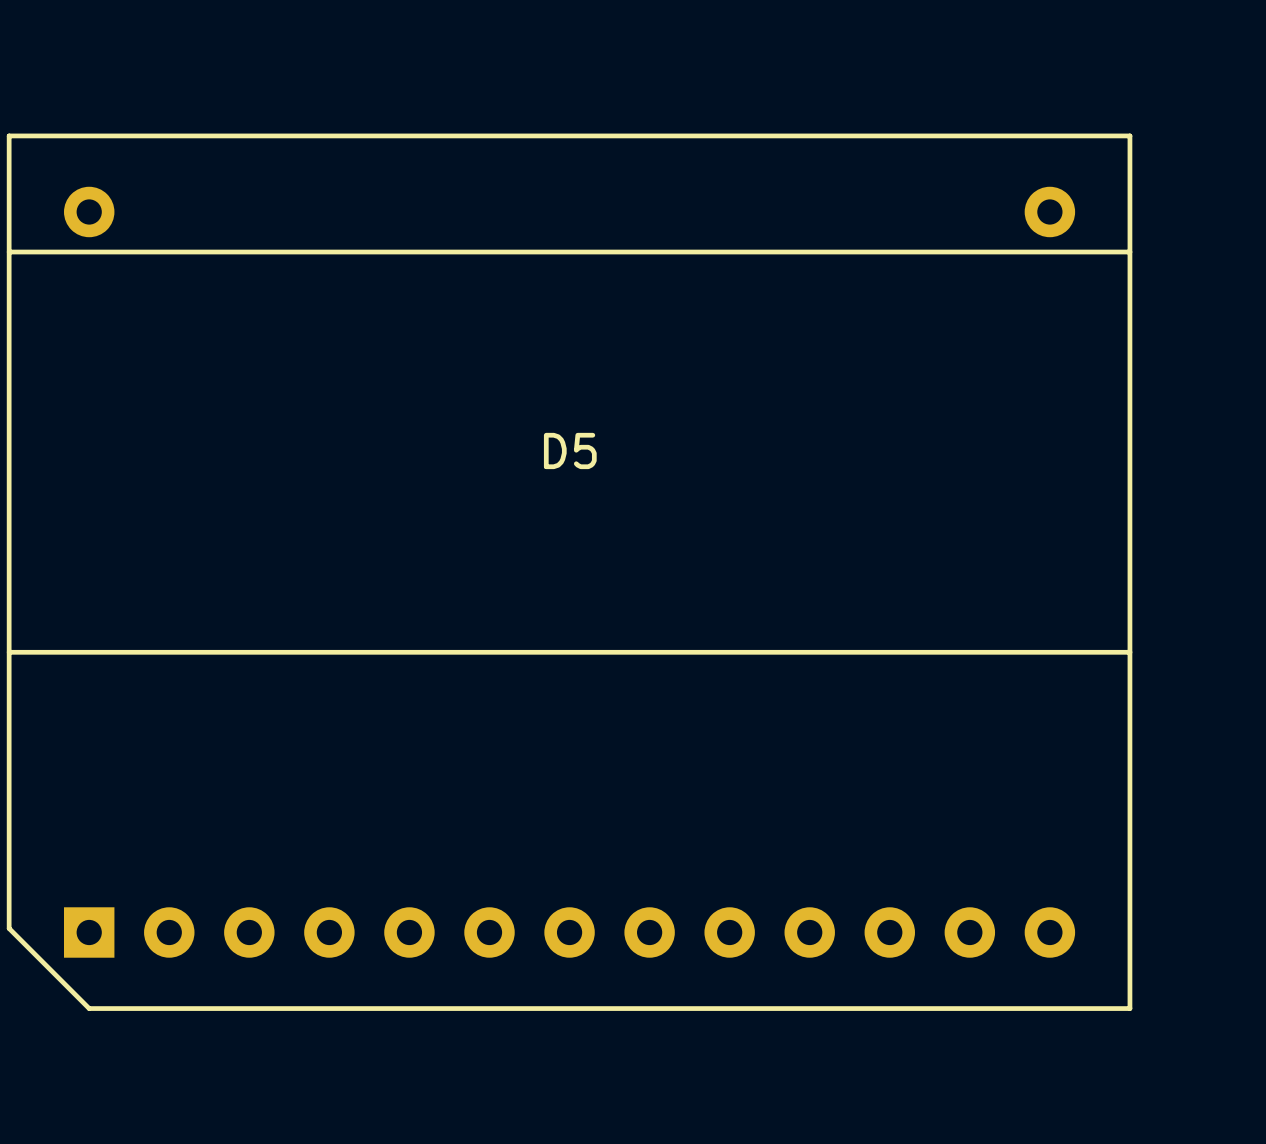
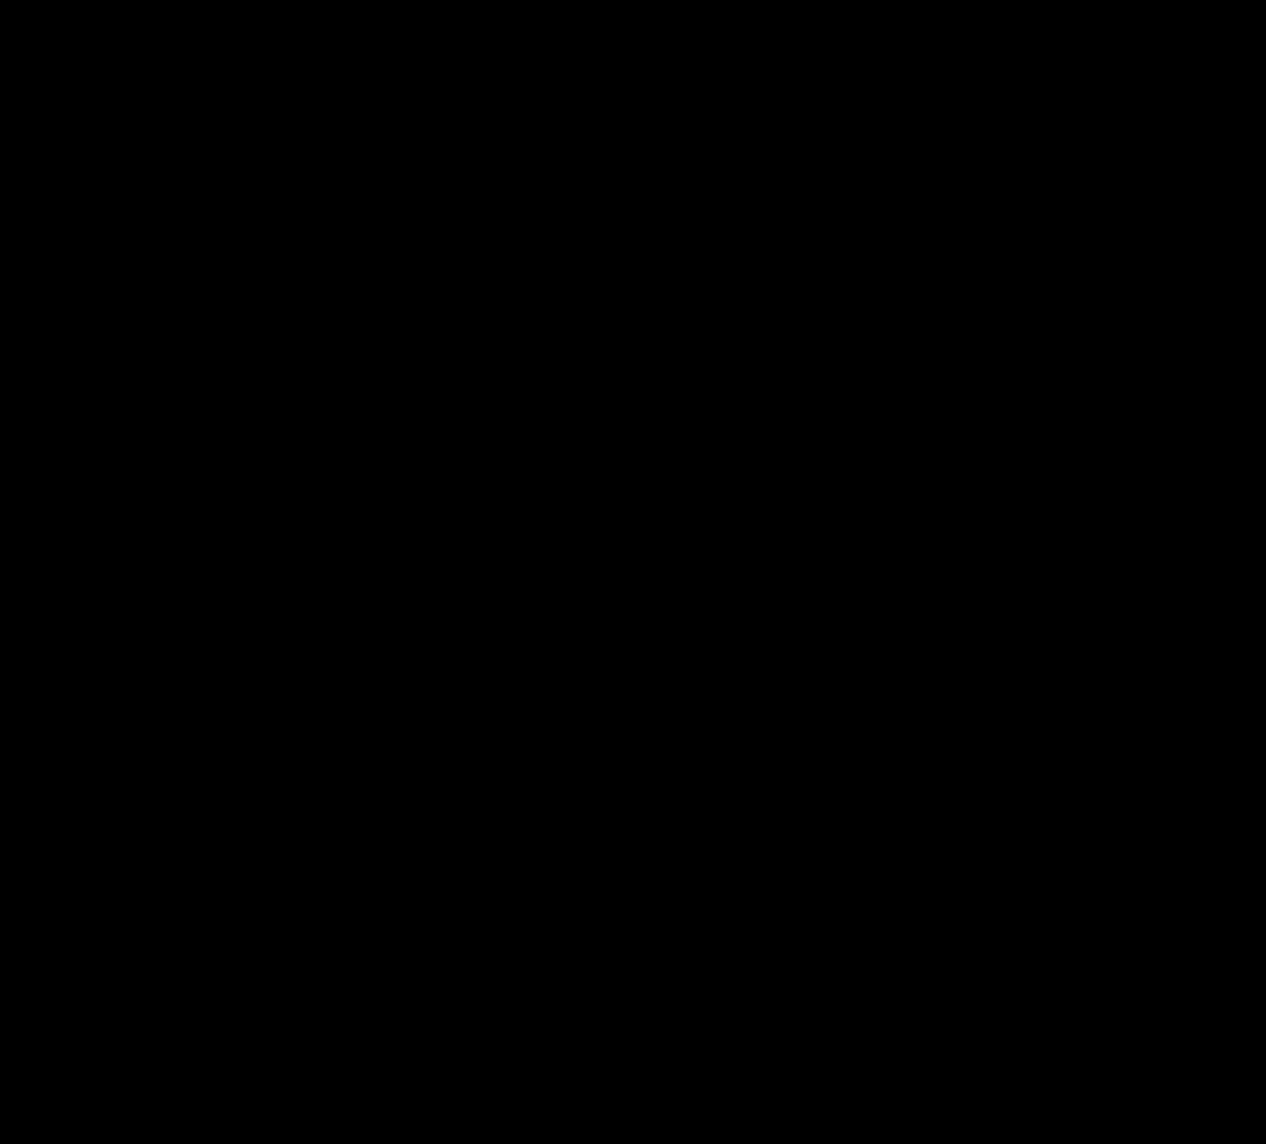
D5: (569, 572) -> none

